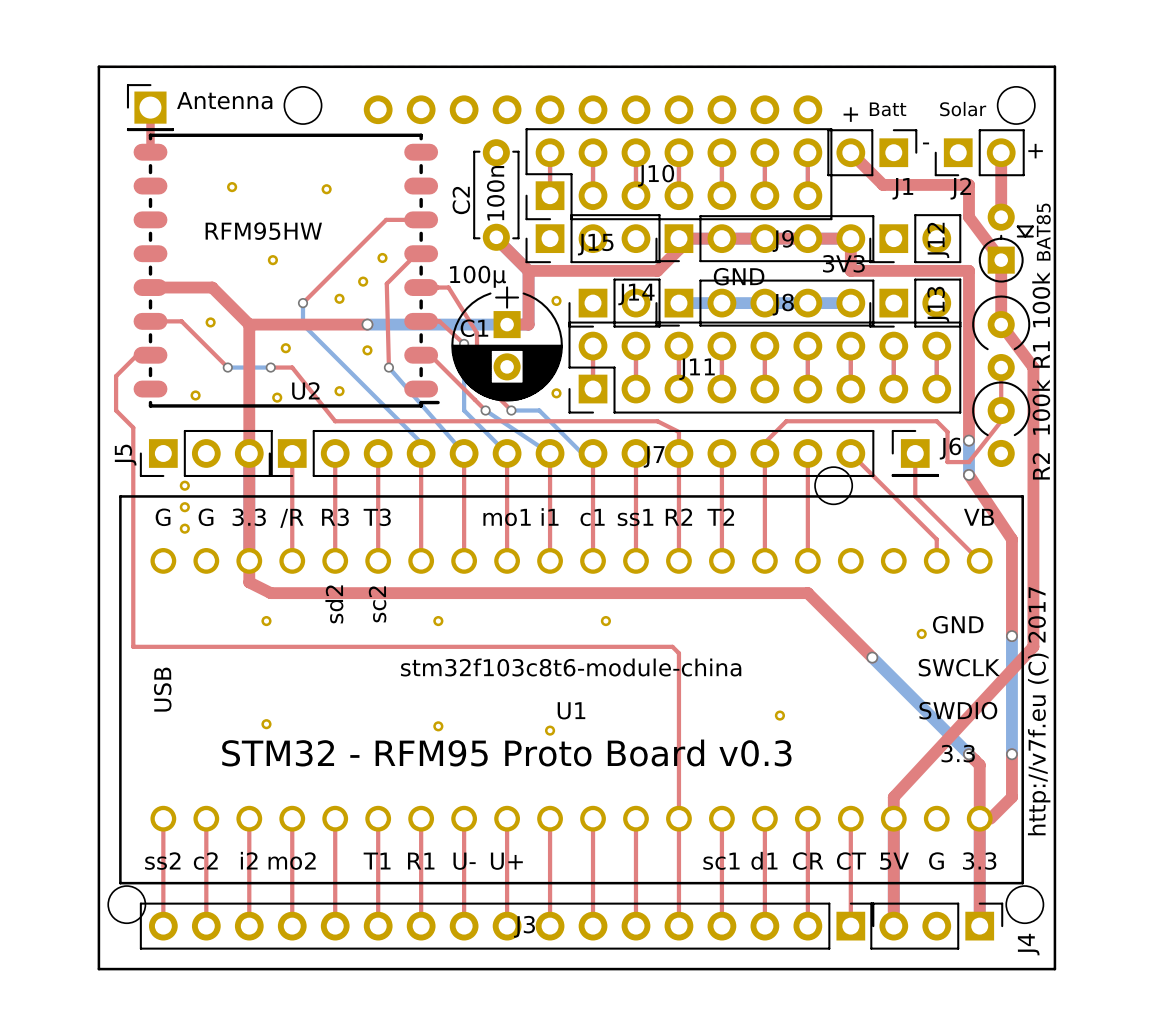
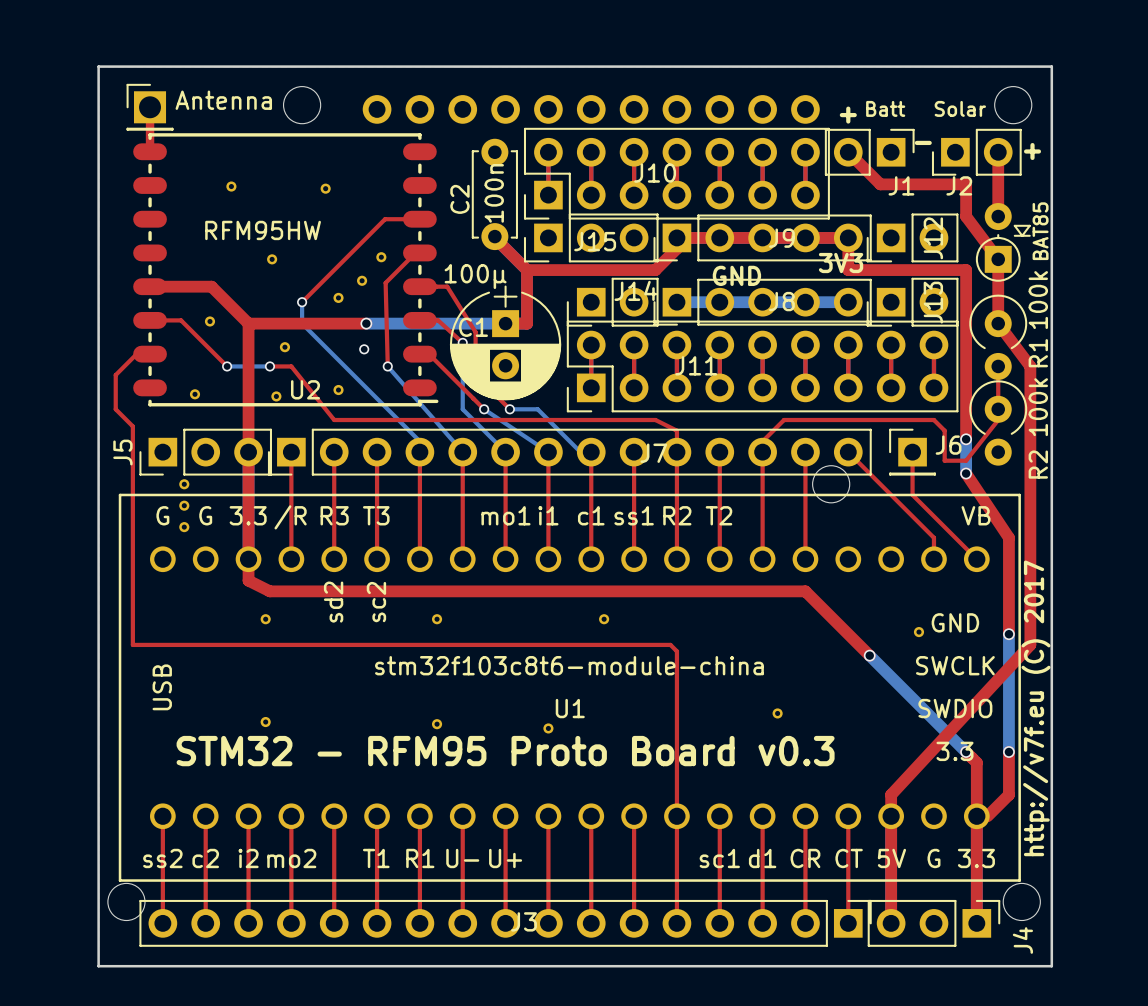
part: (556, 300) -> none
via: none -> (364, 349)
part: (367, 350) -> none
part: (556, 393) -> none

